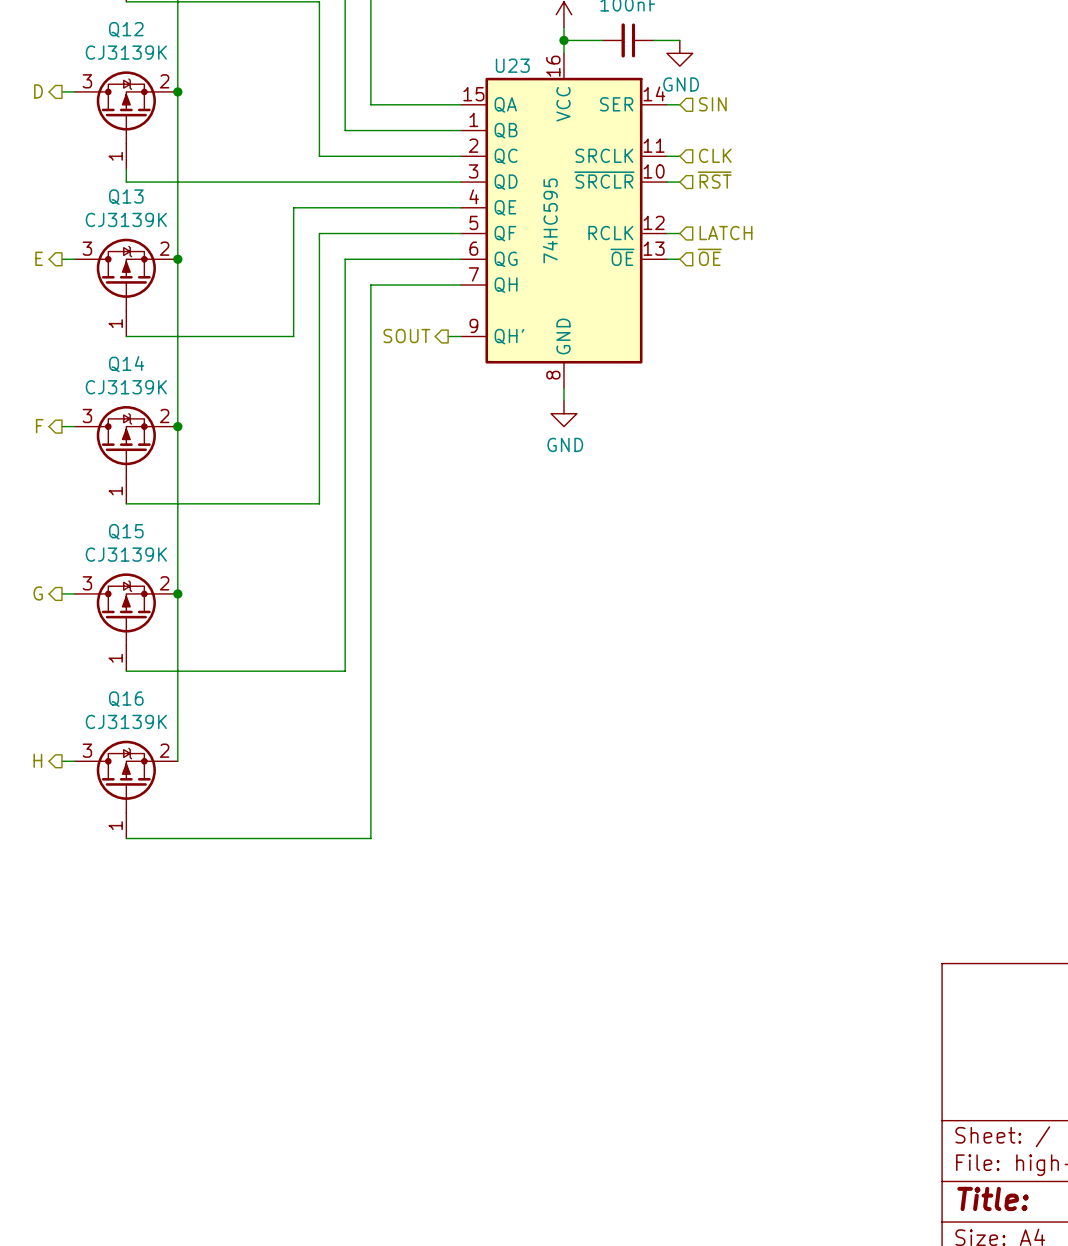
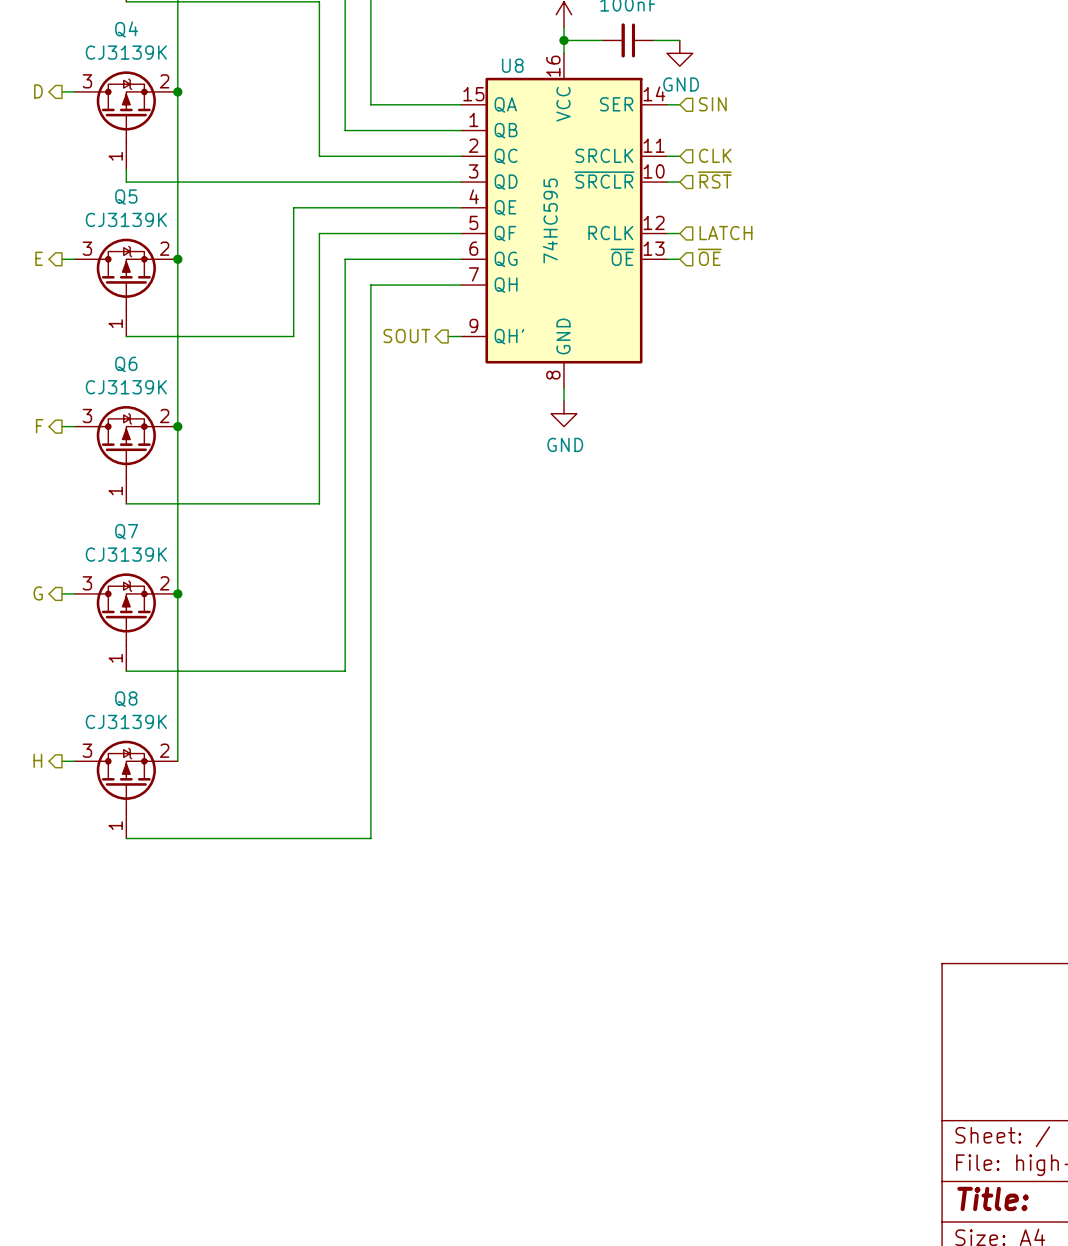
Q12 name: Q12 (126, 29) -> Q4 (126, 29)
U23 name: U23 (512, 65) -> U8 (512, 65)
Q13 name: Q13 (126, 197) -> Q5 (126, 197)
Q14 name: Q14 (126, 364) -> Q6 (126, 364)
Q15 name: Q15 (126, 531) -> Q7 (126, 531)
Q16 name: Q16 (126, 699) -> Q8 (126, 699)

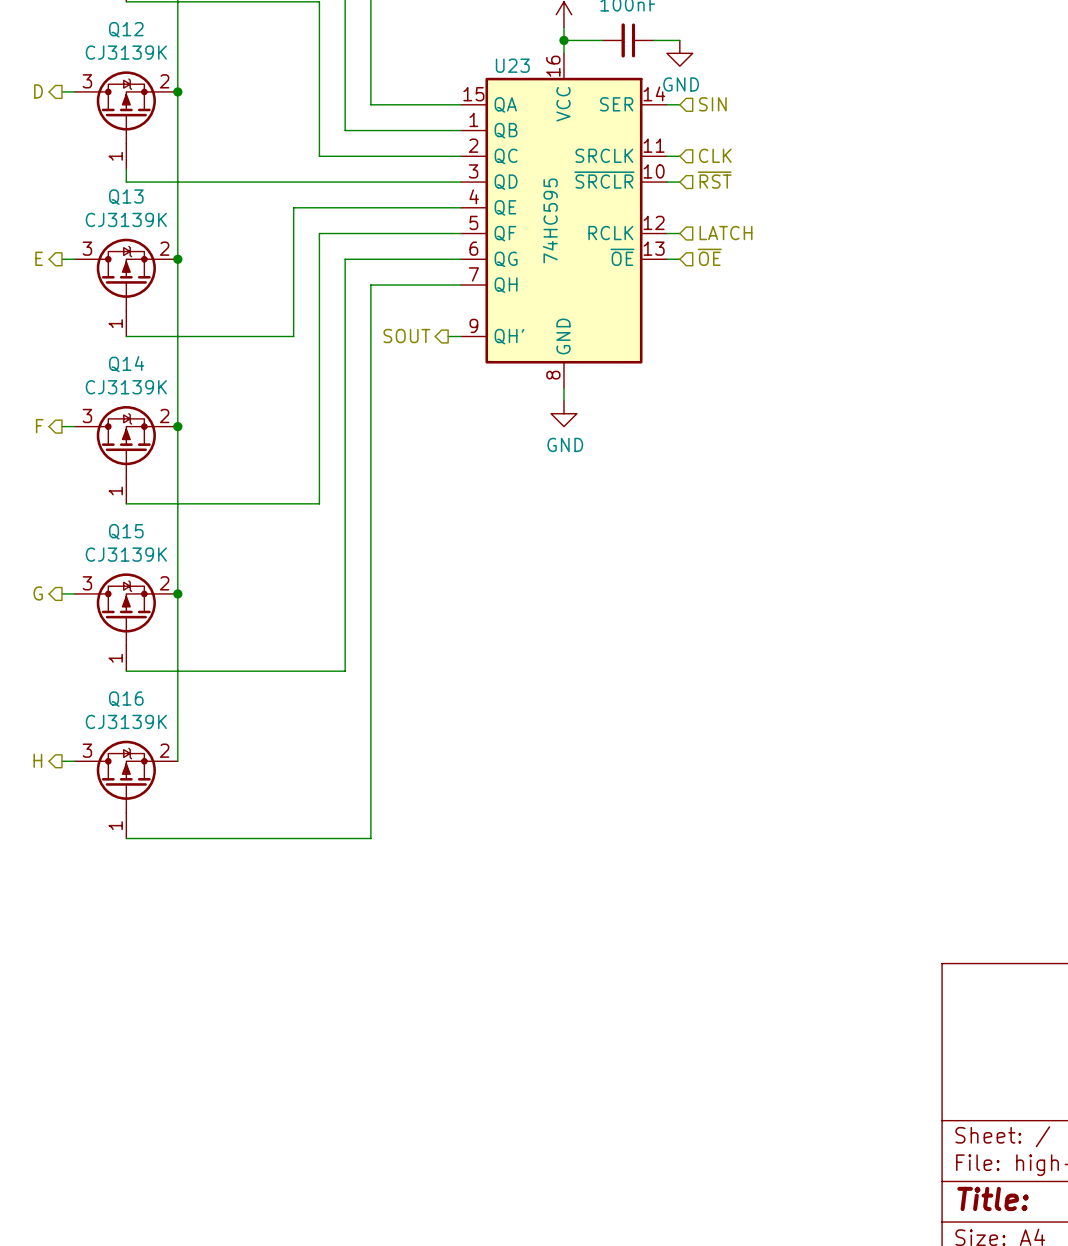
Q4 name: Q4 (126, 29) -> Q12 (126, 29)
U8 name: U8 (512, 65) -> U23 (512, 65)
Q5 name: Q5 (126, 197) -> Q13 (126, 197)
Q6 name: Q6 (126, 364) -> Q14 (126, 364)
Q7 name: Q7 (126, 531) -> Q15 (126, 531)
Q8 name: Q8 (126, 699) -> Q16 (126, 699)

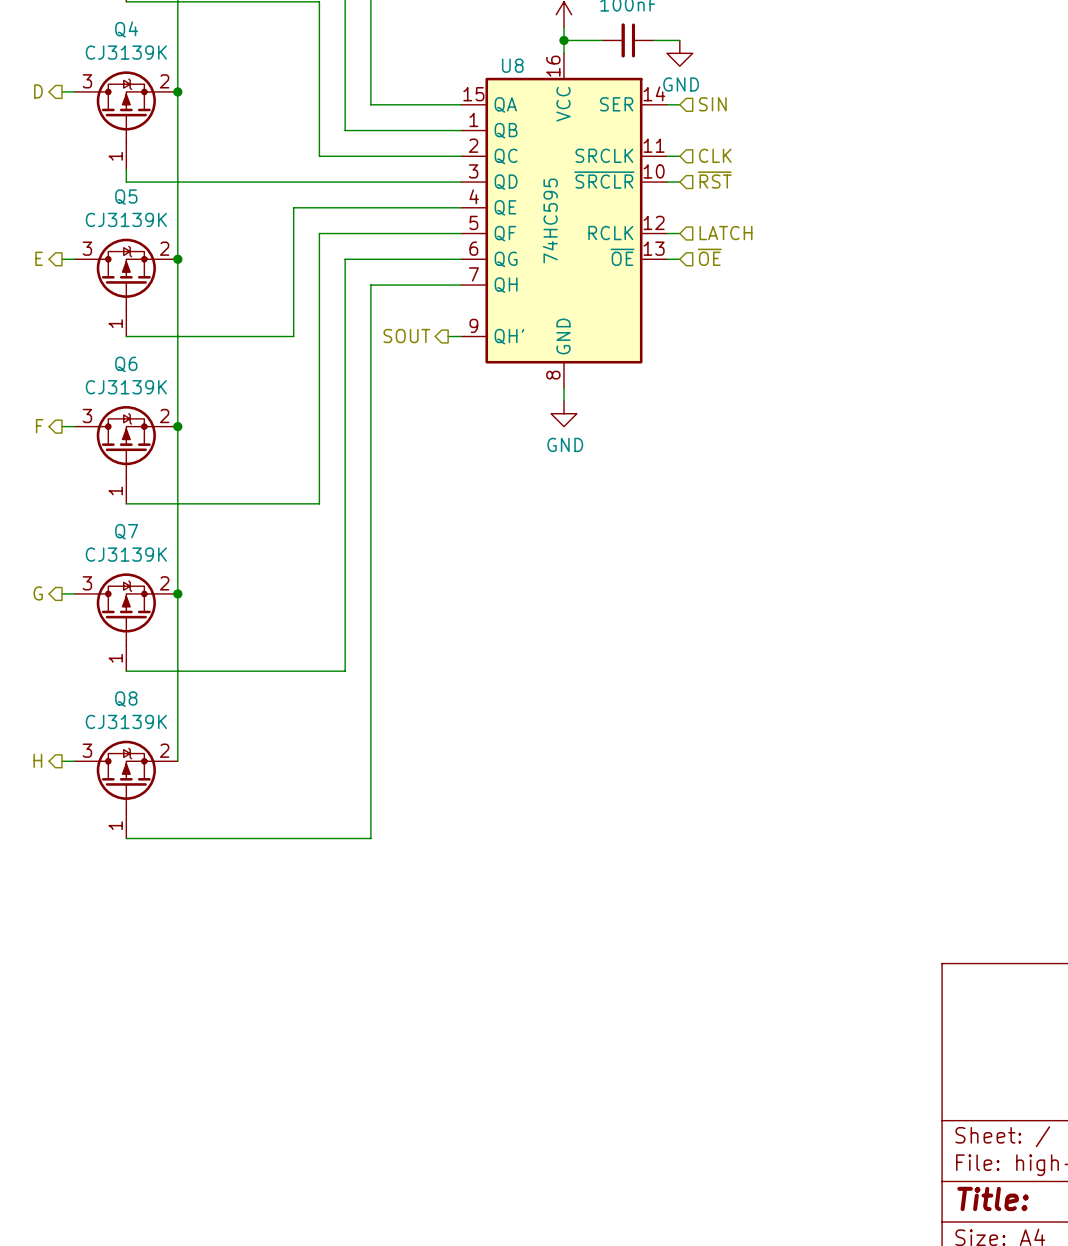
Q12 name: Q12 (126, 29) -> Q4 (126, 29)
U23 name: U23 (512, 65) -> U8 (512, 65)
Q13 name: Q13 (126, 197) -> Q5 (126, 197)
Q14 name: Q14 (126, 364) -> Q6 (126, 364)
Q15 name: Q15 (126, 531) -> Q7 (126, 531)
Q16 name: Q16 (126, 699) -> Q8 (126, 699)

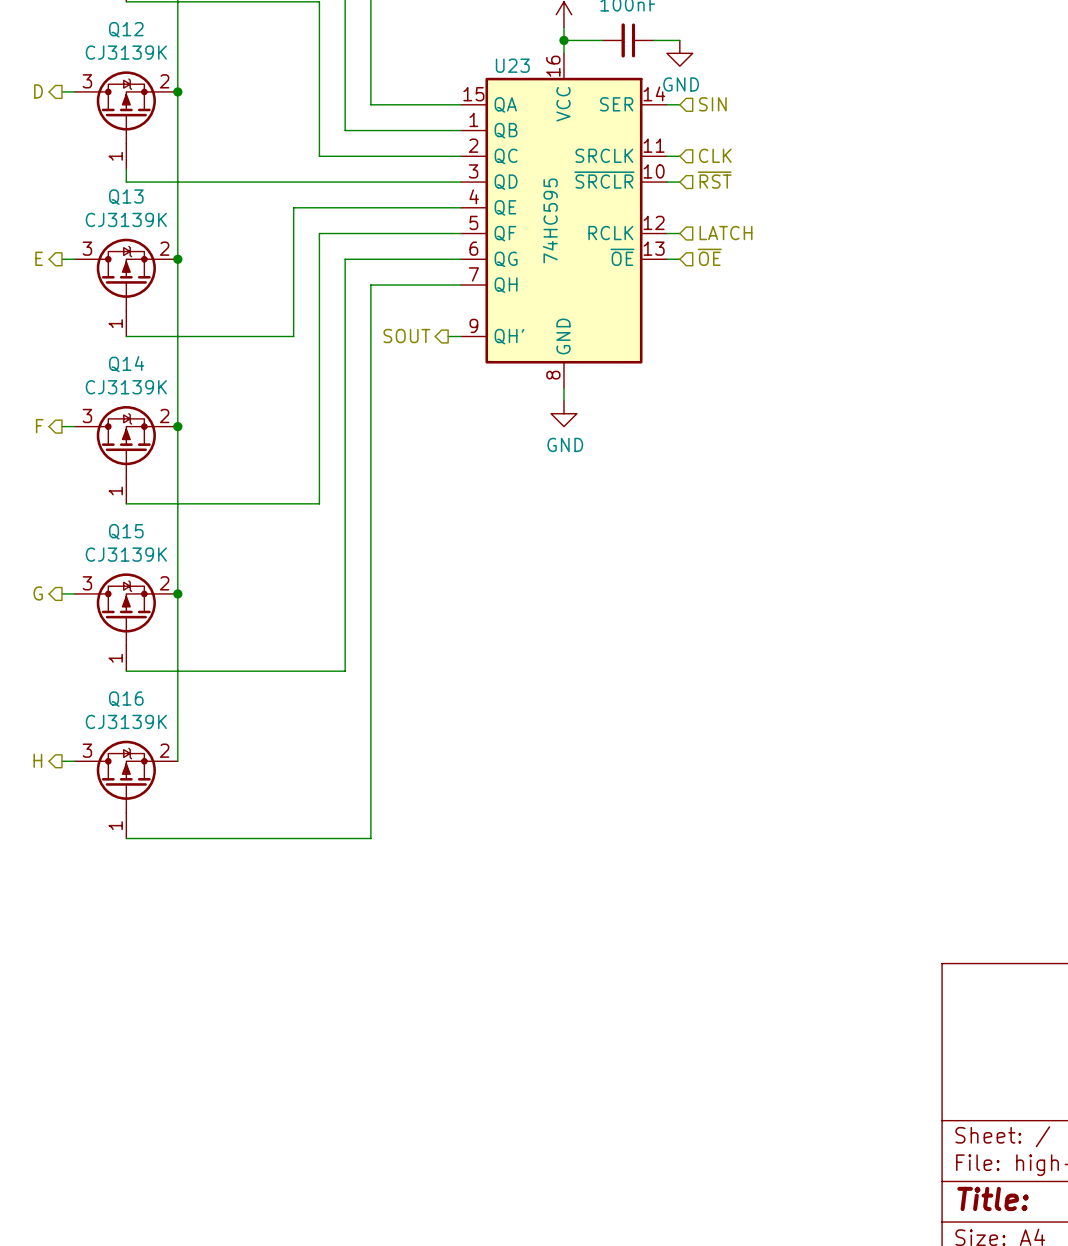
Q4 name: Q4 (126, 29) -> Q12 (126, 29)
U8 name: U8 (512, 65) -> U23 (512, 65)
Q5 name: Q5 (126, 197) -> Q13 (126, 197)
Q6 name: Q6 (126, 364) -> Q14 (126, 364)
Q7 name: Q7 (126, 531) -> Q15 (126, 531)
Q8 name: Q8 (126, 699) -> Q16 (126, 699)

